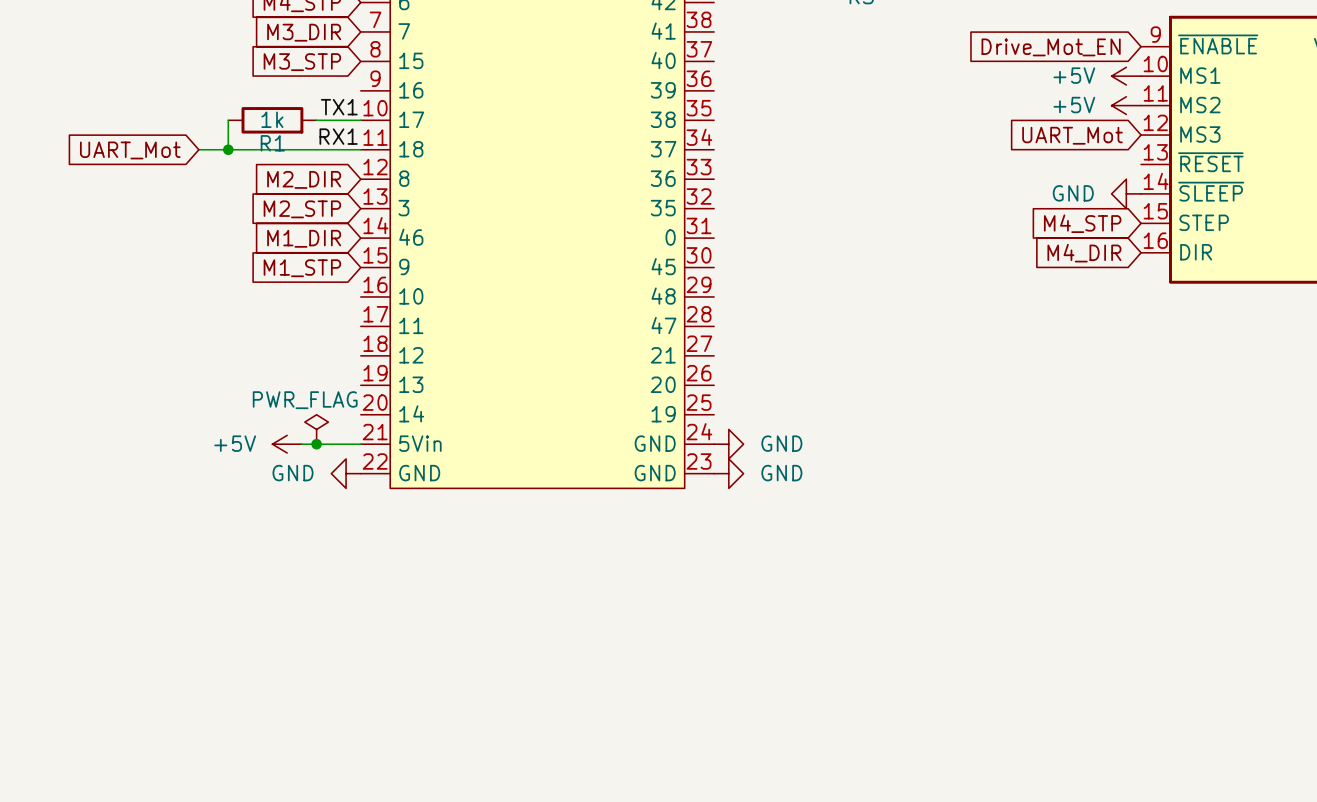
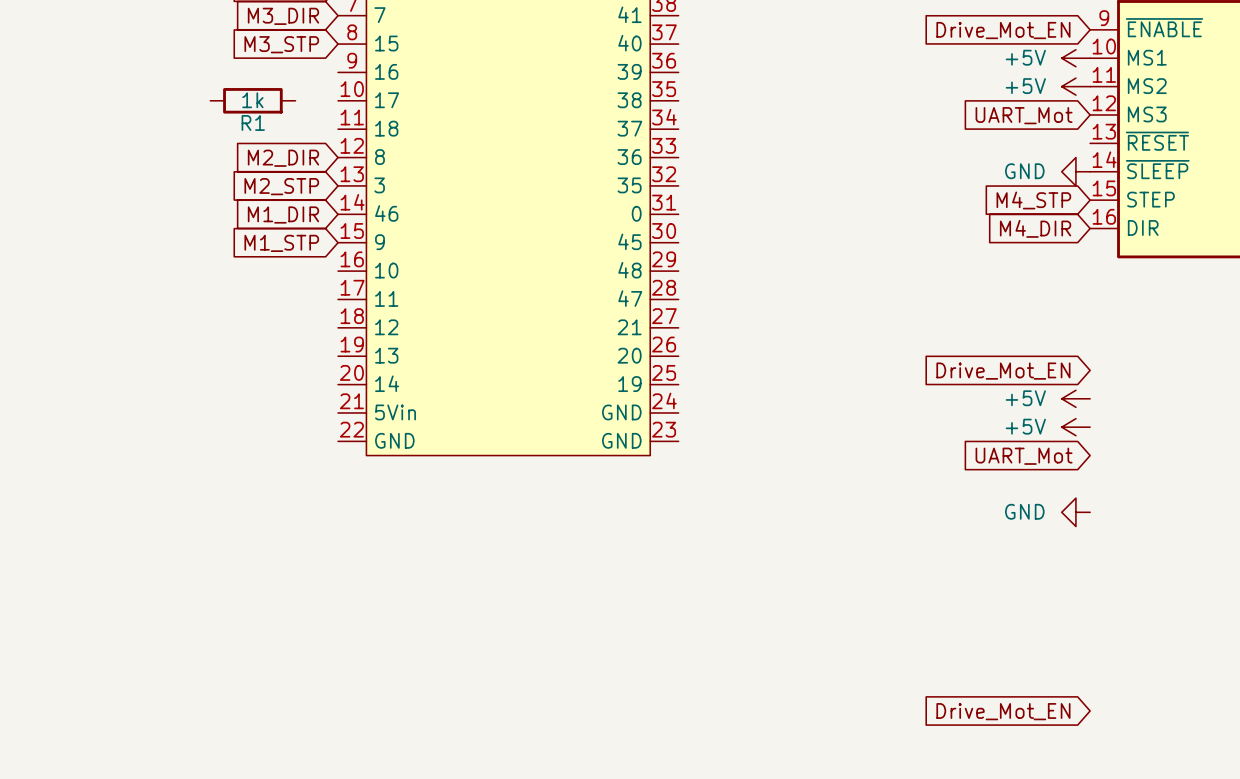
label: TX1 (339, 107) -> none
wire: (228, 120) (228, 149) -> none
wire: (316, 120) (360, 120) -> none
label: RX1 (338, 136) -> none
wire: (198, 149) (360, 149) -> none
junction: (228, 149) -> none
global label: UART_Mot (130, 150) -> none
global label: none -> Drive_Mot_EN (1003, 371)
power symbol: PWR_FLAG (316, 429) -> none
power symbol: none -> +5V (1075, 398)
power symbol: +5V (287, 444) -> none
wire: (301, 444) (360, 444) -> none
junction: (316, 444) -> none
power symbol: GND (728, 444) -> none
power symbol: none -> +5V (1075, 427)
power symbol: GND (346, 473) -> none
power symbol: GND (728, 473) -> none
global label: none -> UART_Mot (1024, 456)
power symbol: none -> GND (1075, 512)
global label: none -> Drive_Mot_EN (1003, 711)

